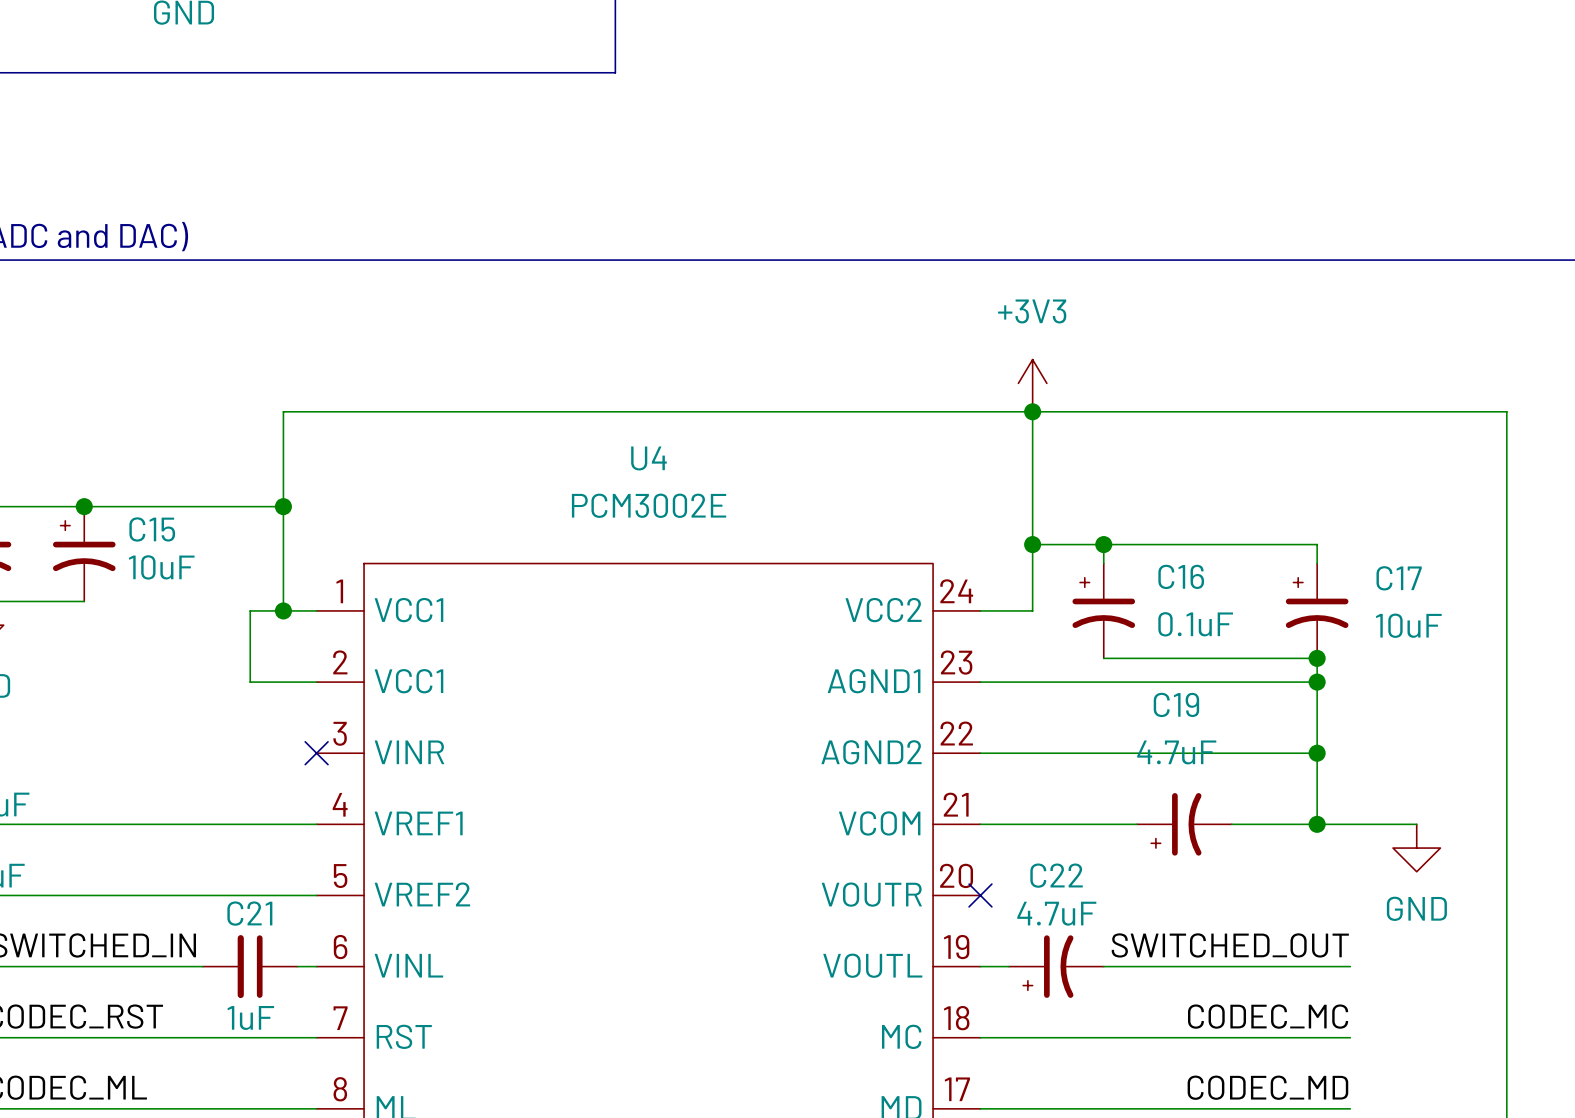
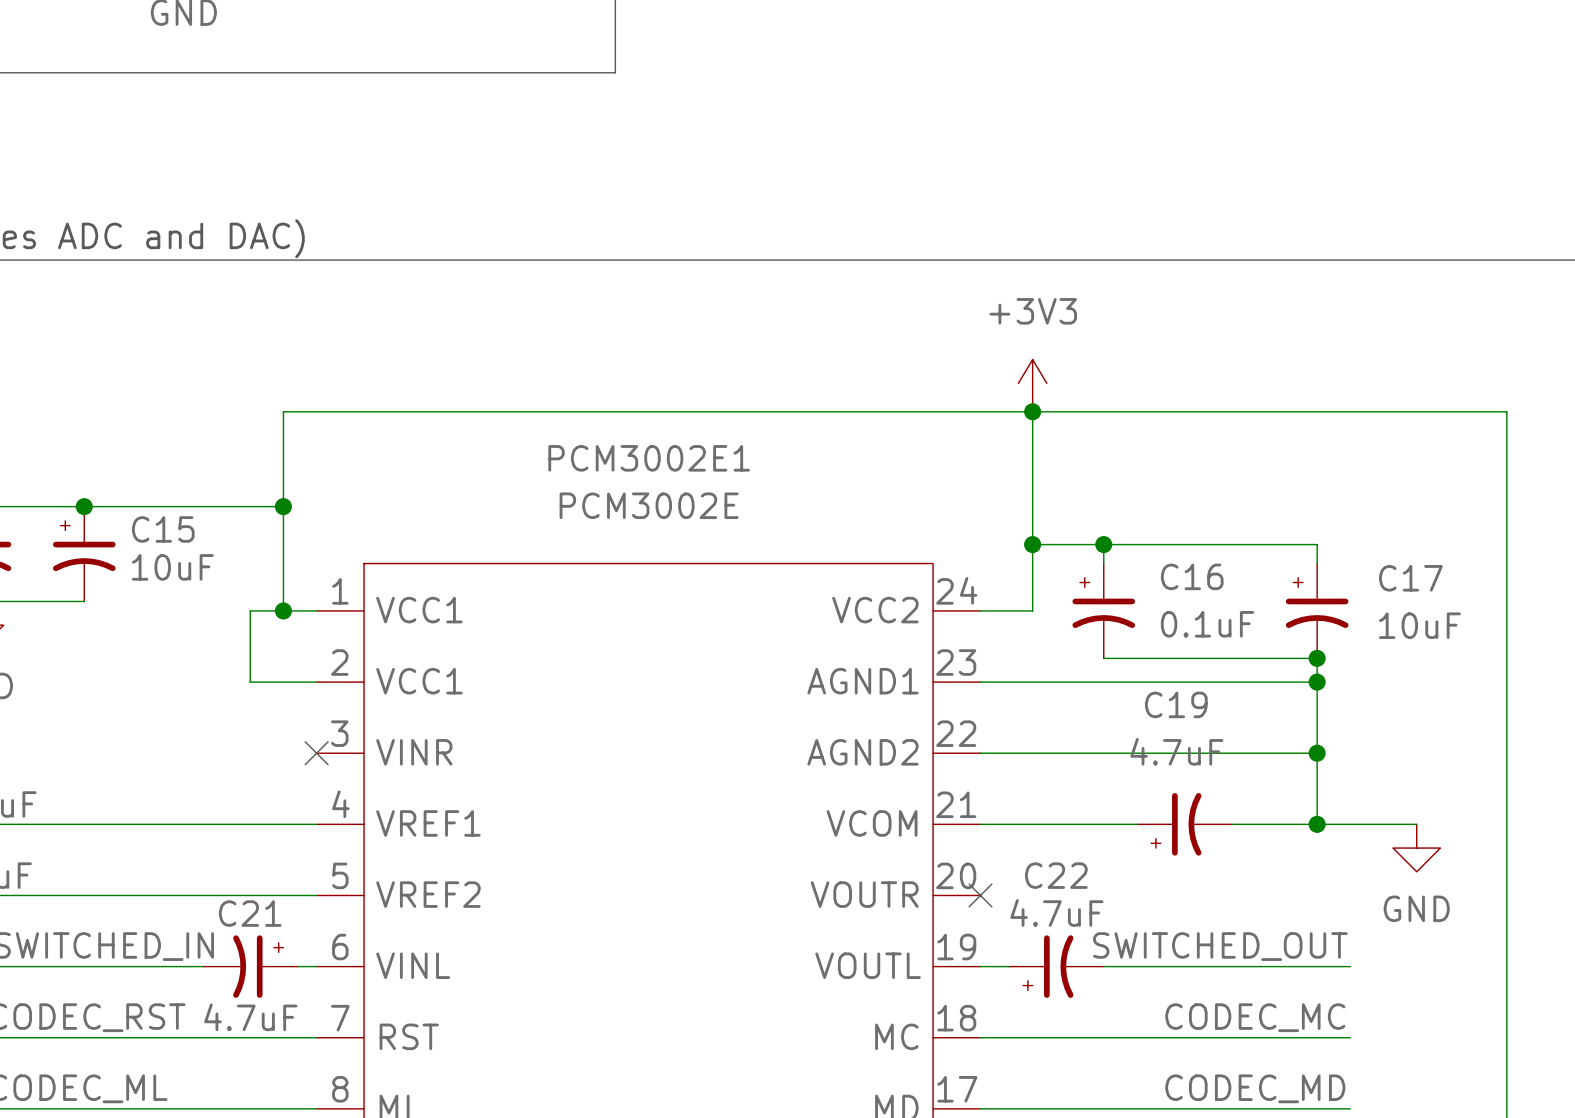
U4 name: U4 (648, 458) -> PCM3002E1 (649, 458)
C21 symbol: [202, 935, 298, 999] -> [202, 935, 298, 998]
C21 value: 1uF (250, 1017) -> 4.7uF (250, 1017)

